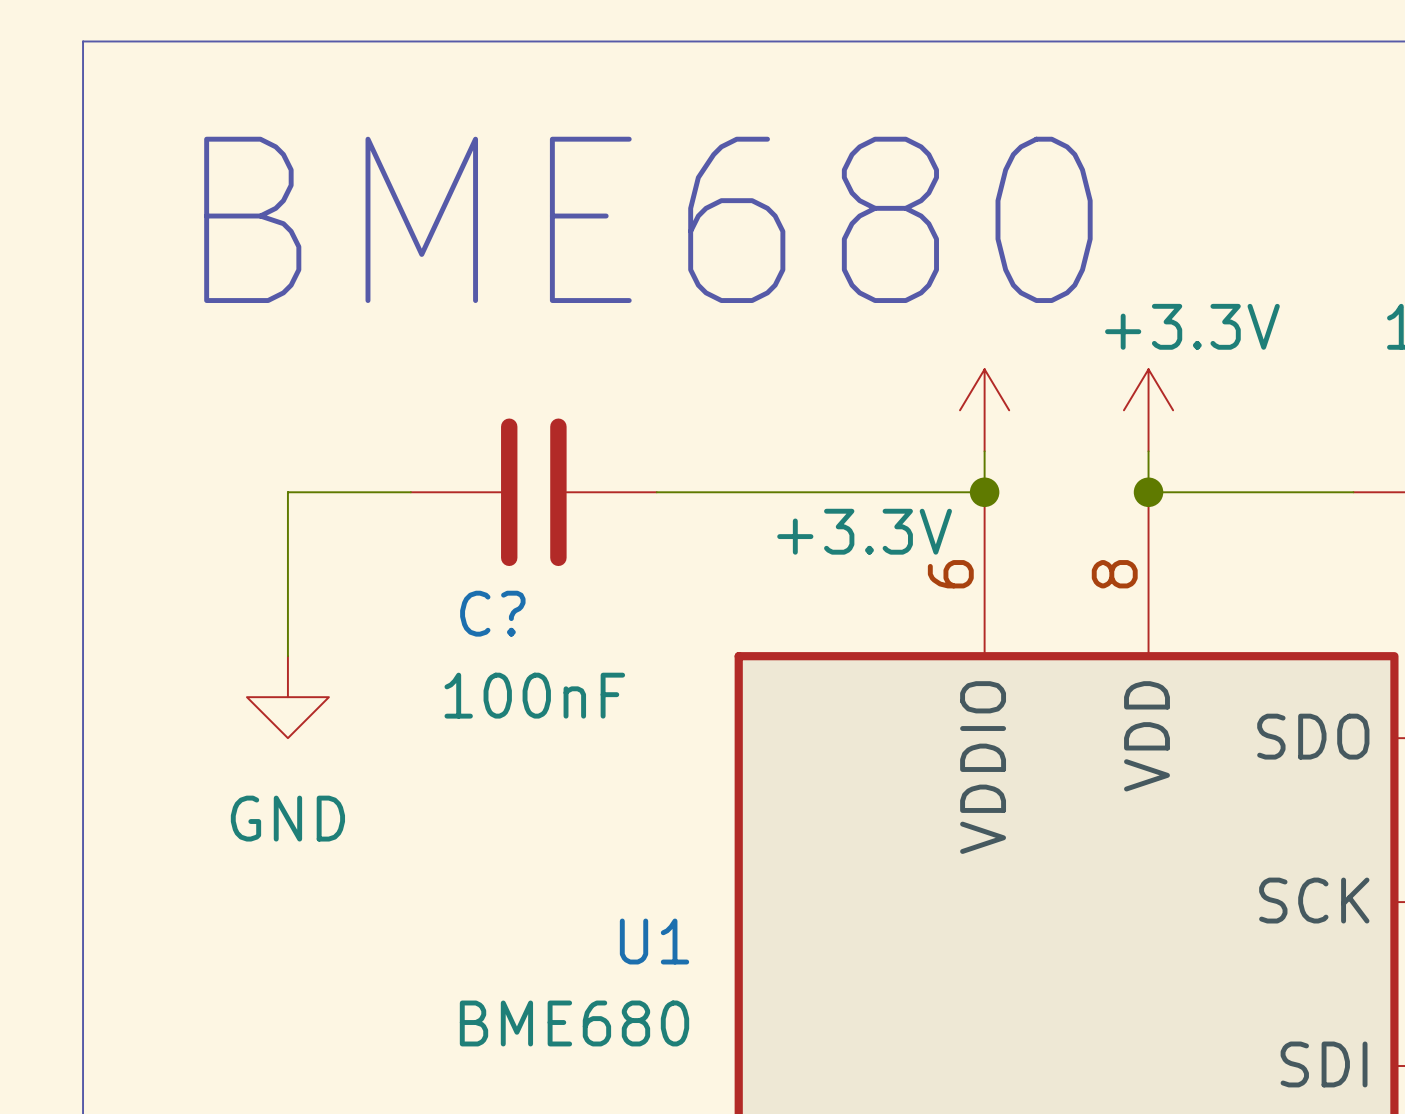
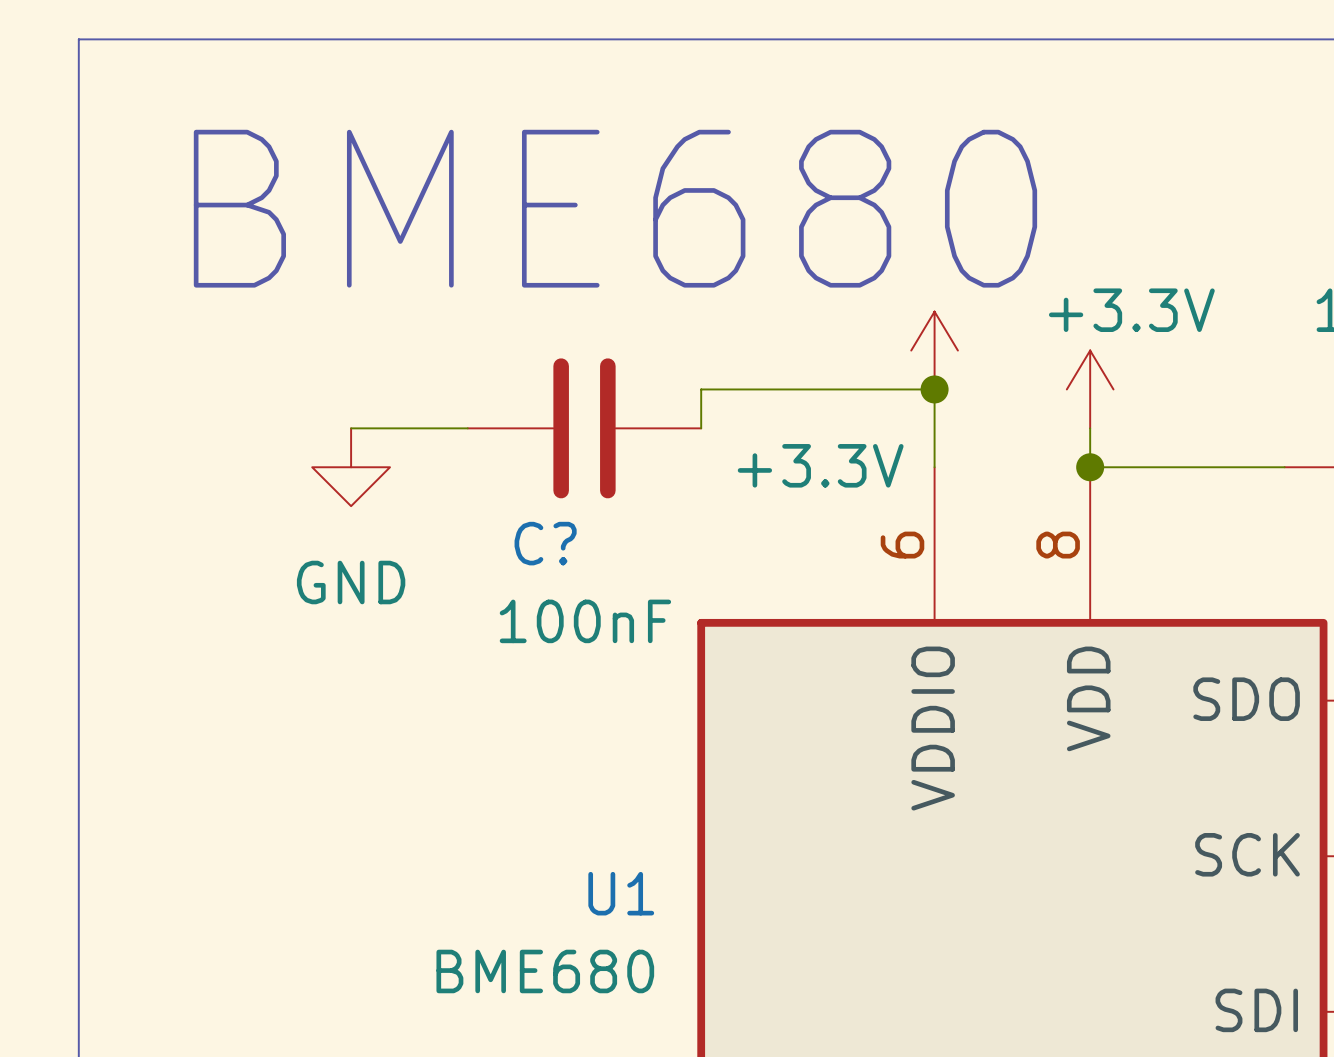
power symbol position: +3.3V (984, 410) -> +3.3V (934, 350)
wire: none -> (351, 428) (467, 428)
wire: none -> (701, 428) (701, 389) (934, 389) (934, 428)
wire: (410, 492) (287, 492) (287, 656) -> none
C? position: (533, 492) -> (584, 428)
wire: (656, 492) (984, 492) -> none
junction position: (984, 492) -> (934, 389)
power symbol position: GND (287, 697) -> GND (351, 467)

